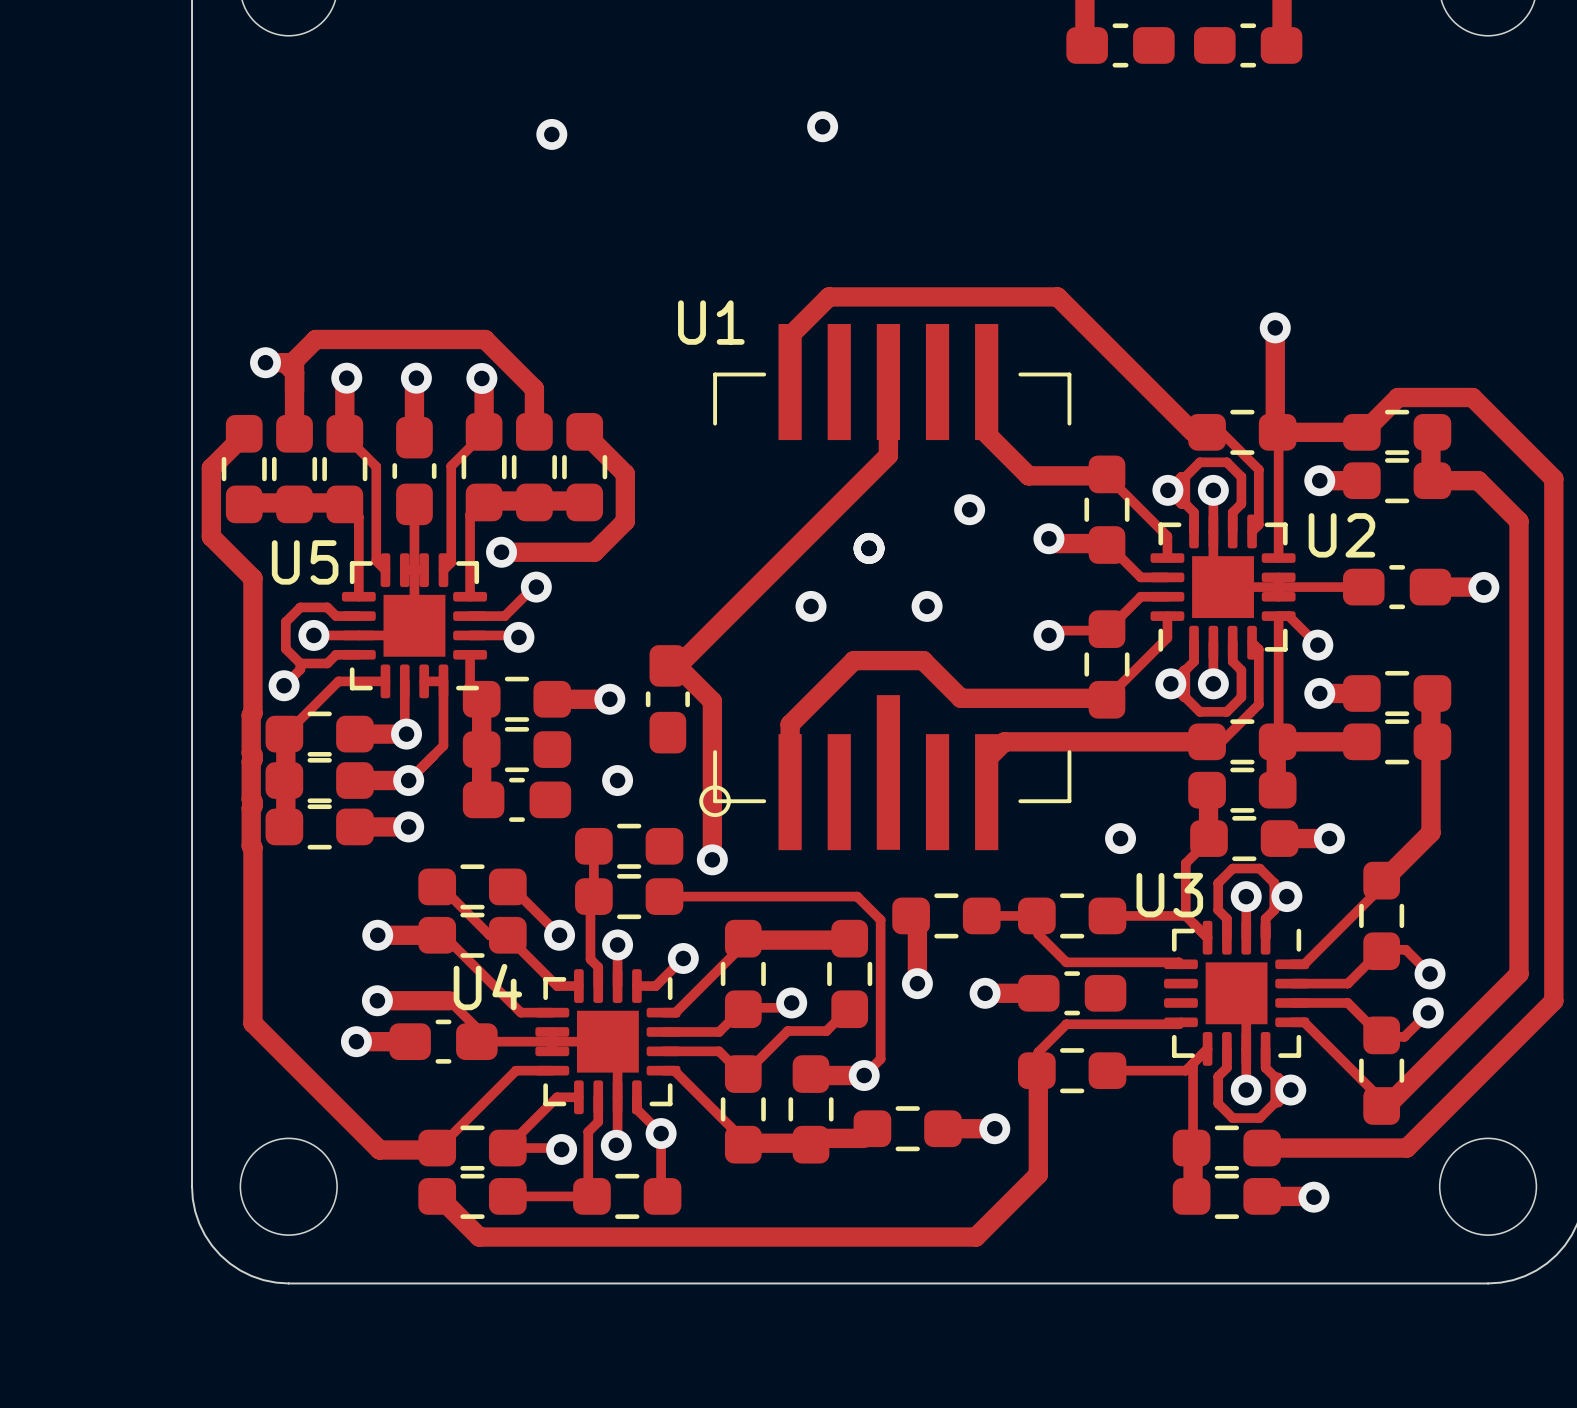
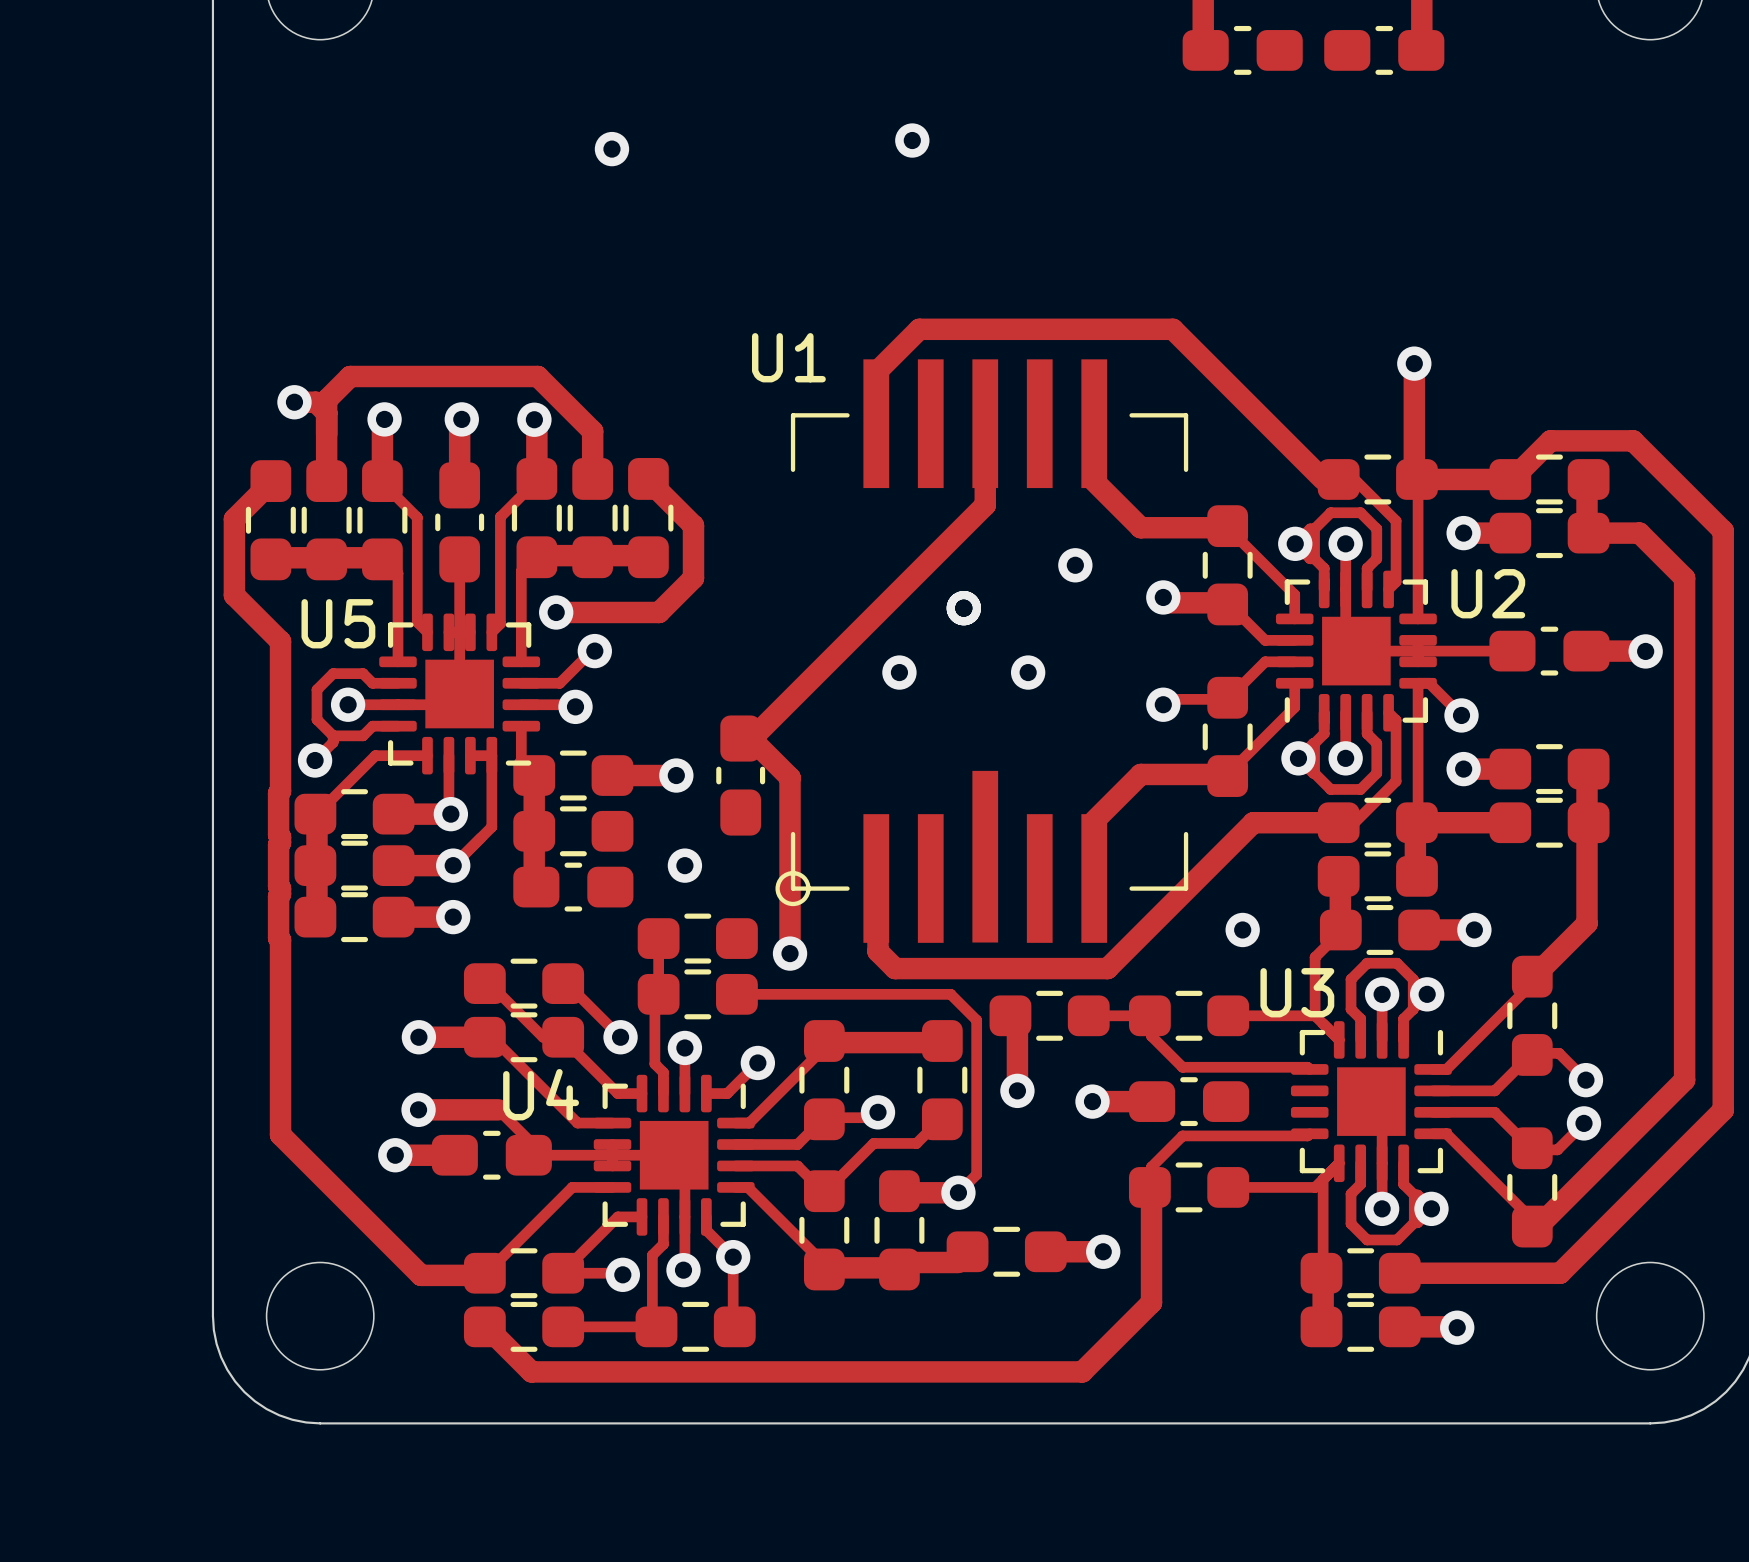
track: (1028, 698) (960, 698) (923, 660) (853, 660) (790, 724) (790, 792) -> (1253, 822) (1107, 968) (895, 968) (877, 951) (877, 880) (876, 878)
track: (1130, 741) (1004, 741) (986, 759) -> (1140, 774) (1094, 821) (1094, 842)

